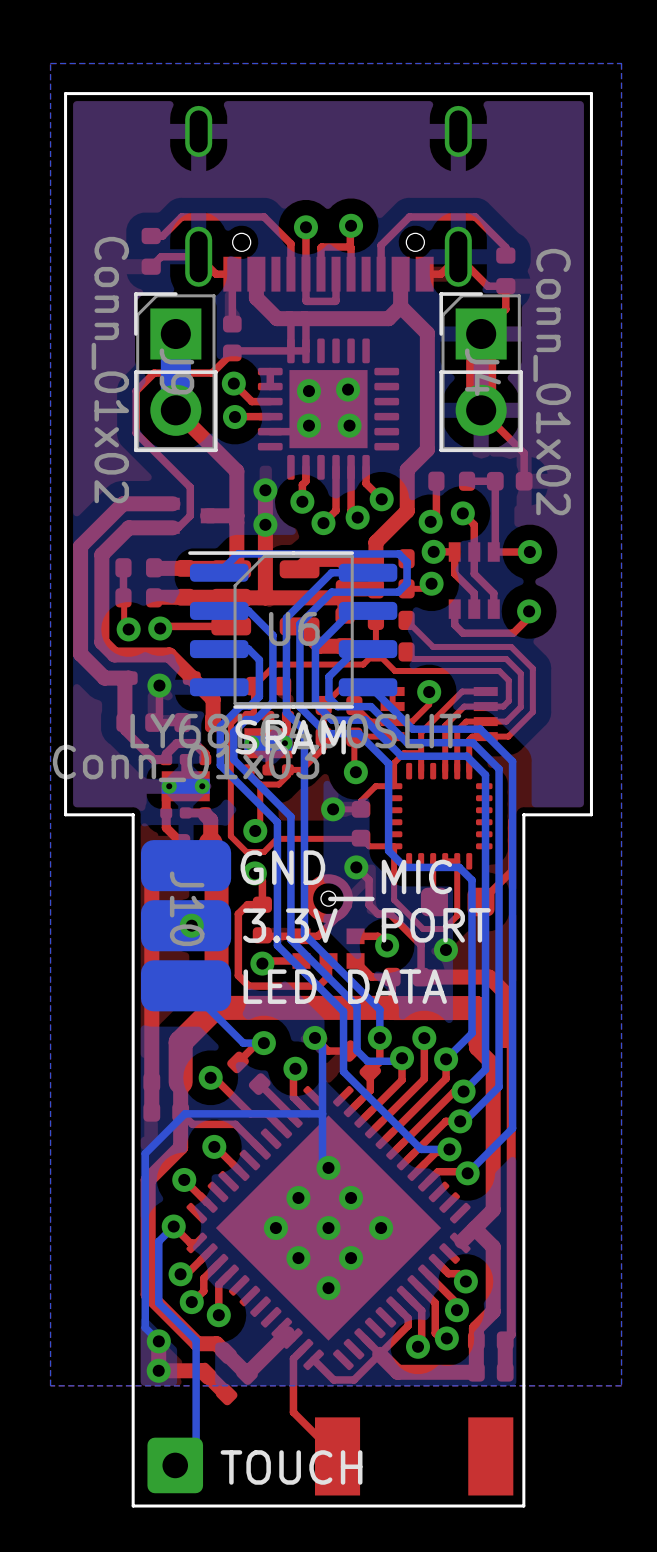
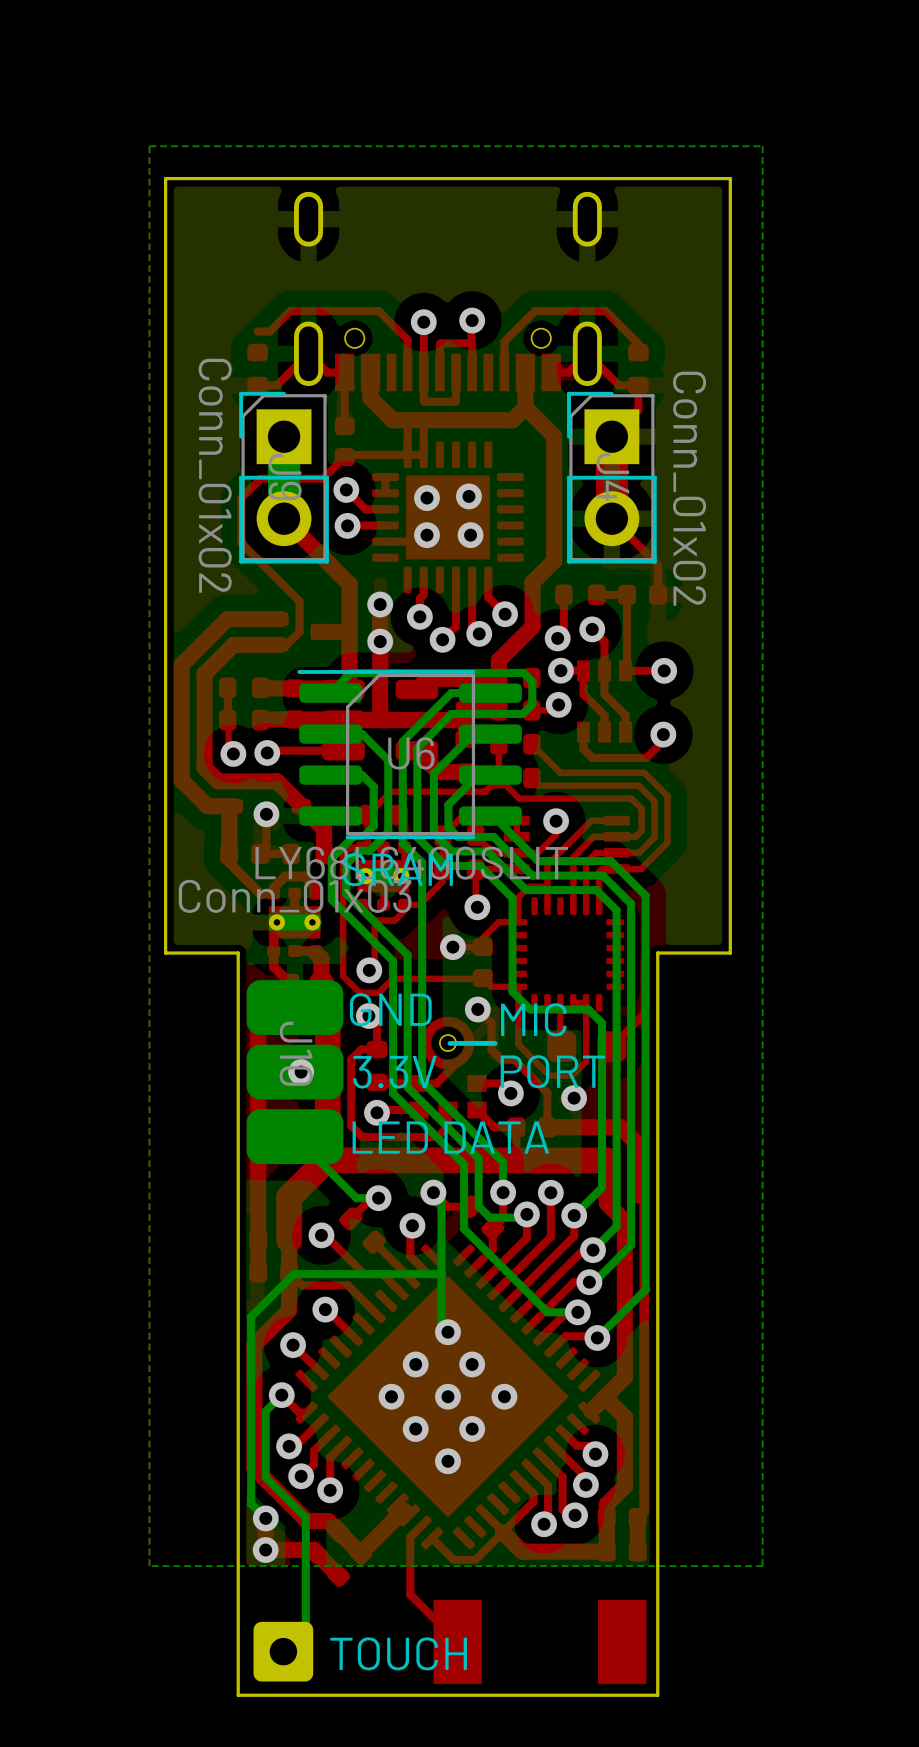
part position: (151, 251) -> (257, 368)
top track: (198, 256) (161, 256) (151, 266) -> (308, 353) (276, 385) (257, 385)

